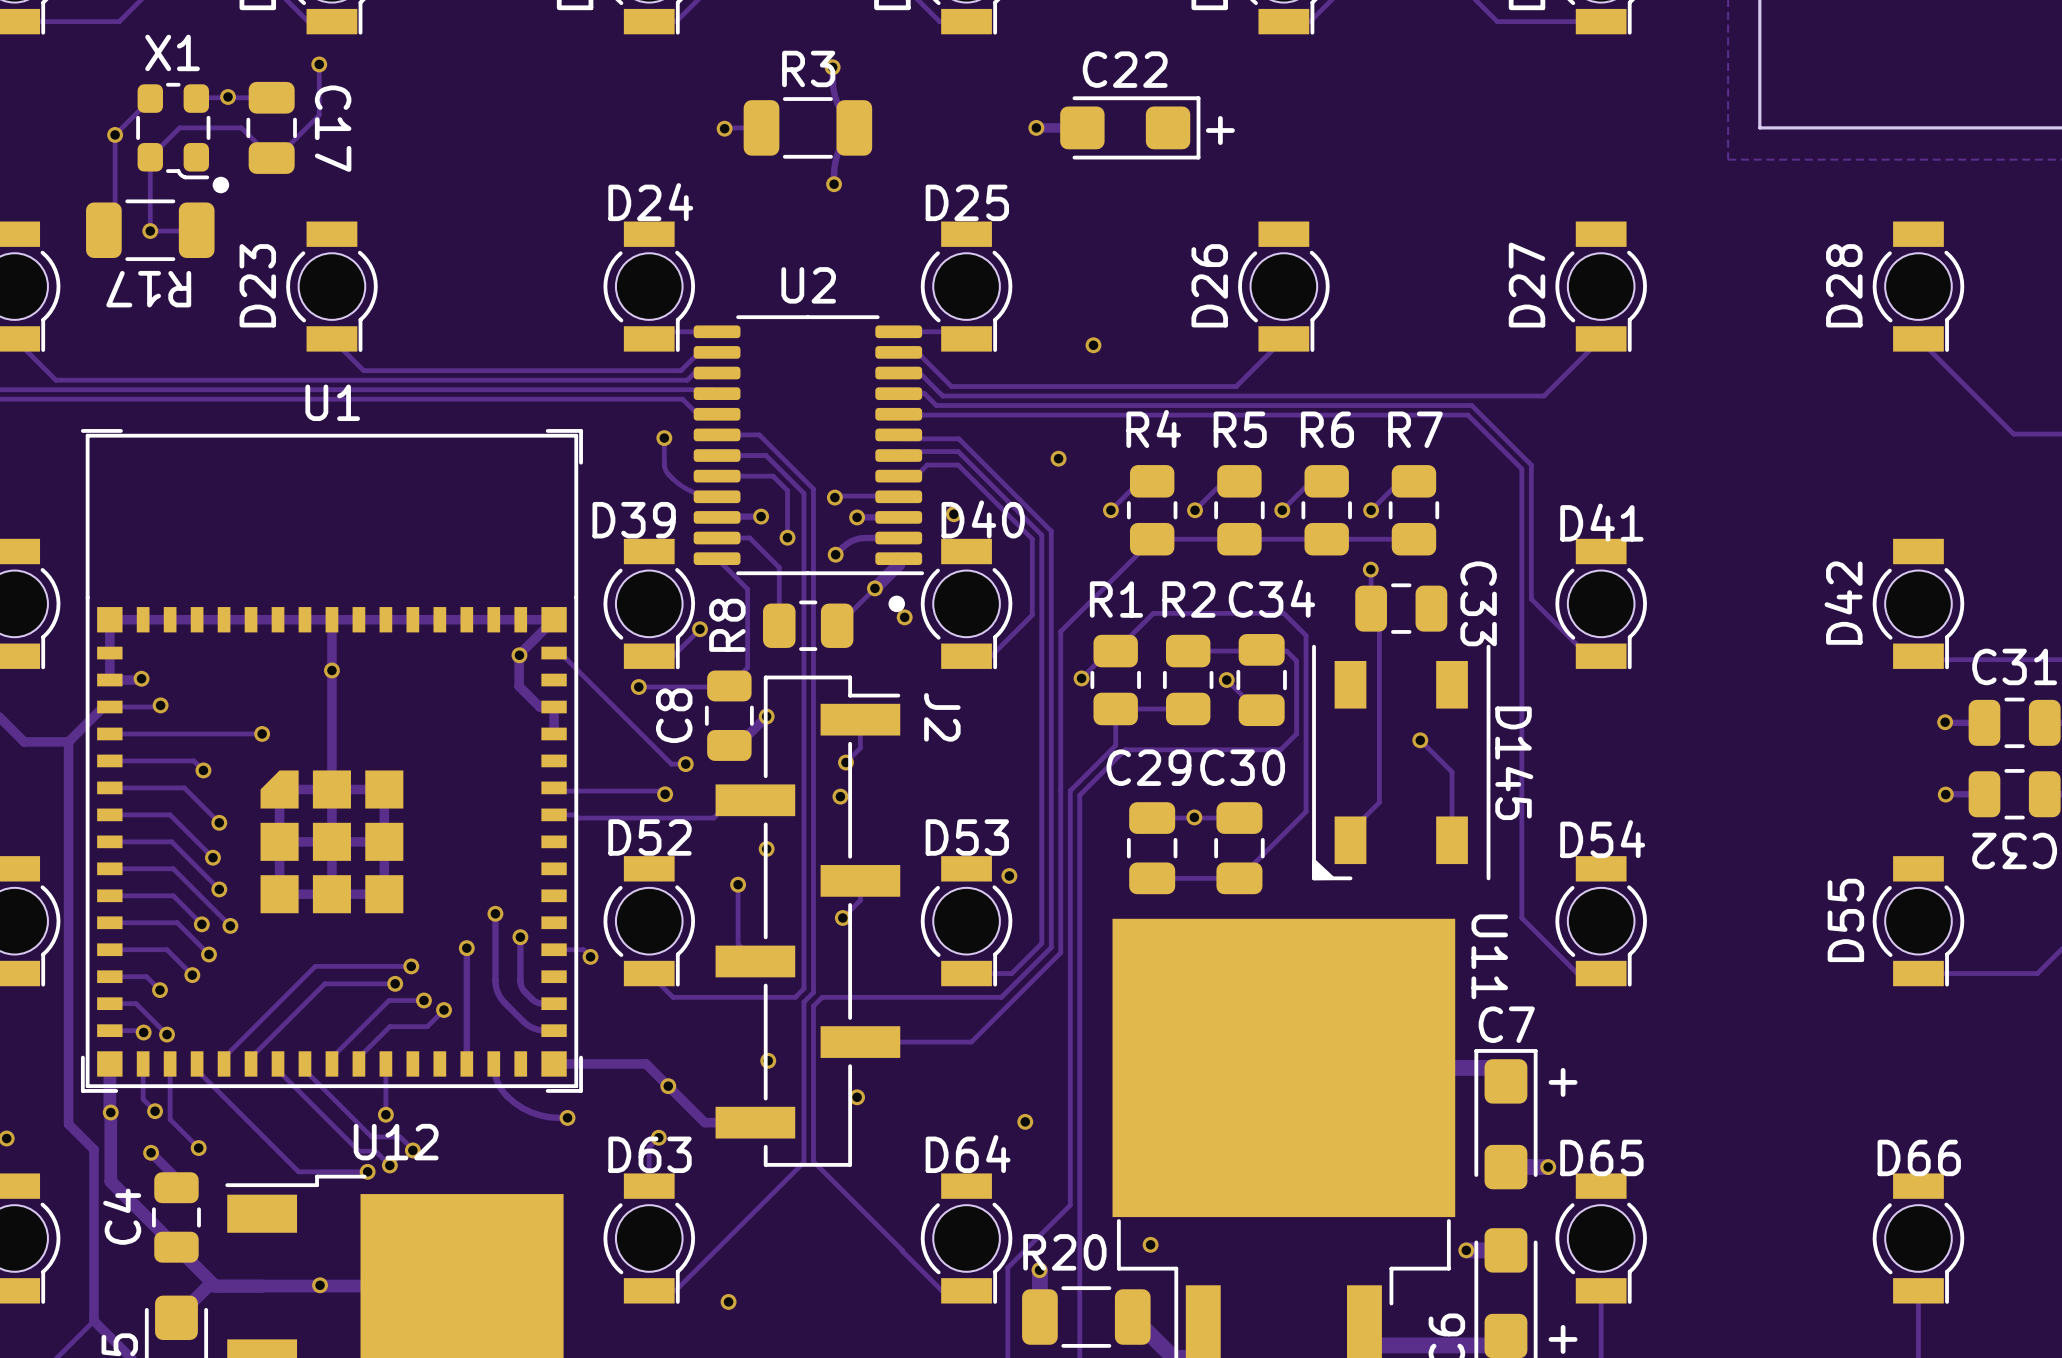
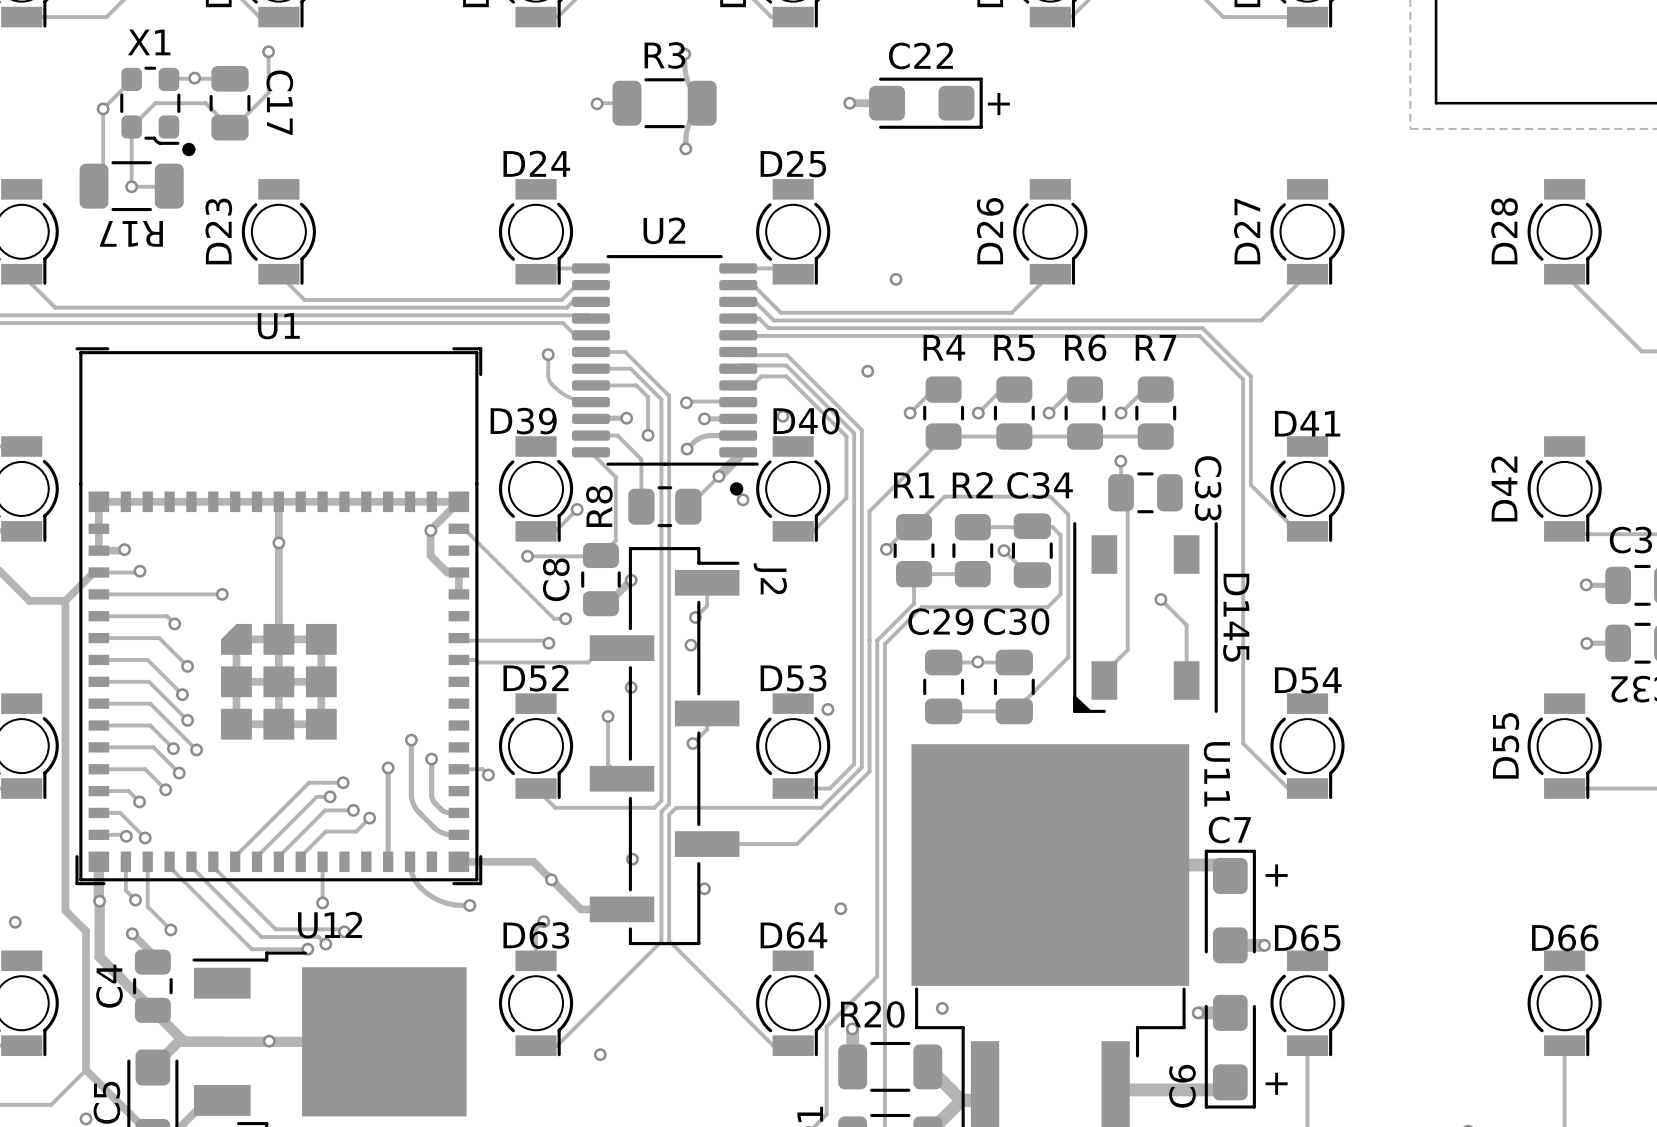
track: (369, 966) (315, 966) (224, 1057) (224, 1063) -> (309, 782) (235, 856)
track: (378, 983) (324, 983) (251, 1057) (251, 1063) -> (316, 796) (257, 856)
track: (278, 1063) (278, 1070) (358, 1151) (375, 1151) (381, 1156) -> (191, 861) (191, 866) (261, 937) (318, 937)
track: (304, 1063) (304, 1070) (371, 1136) (400, 1136) (407, 1144) -> none
track: none -> (213, 866) (275, 929) (341, 929)

